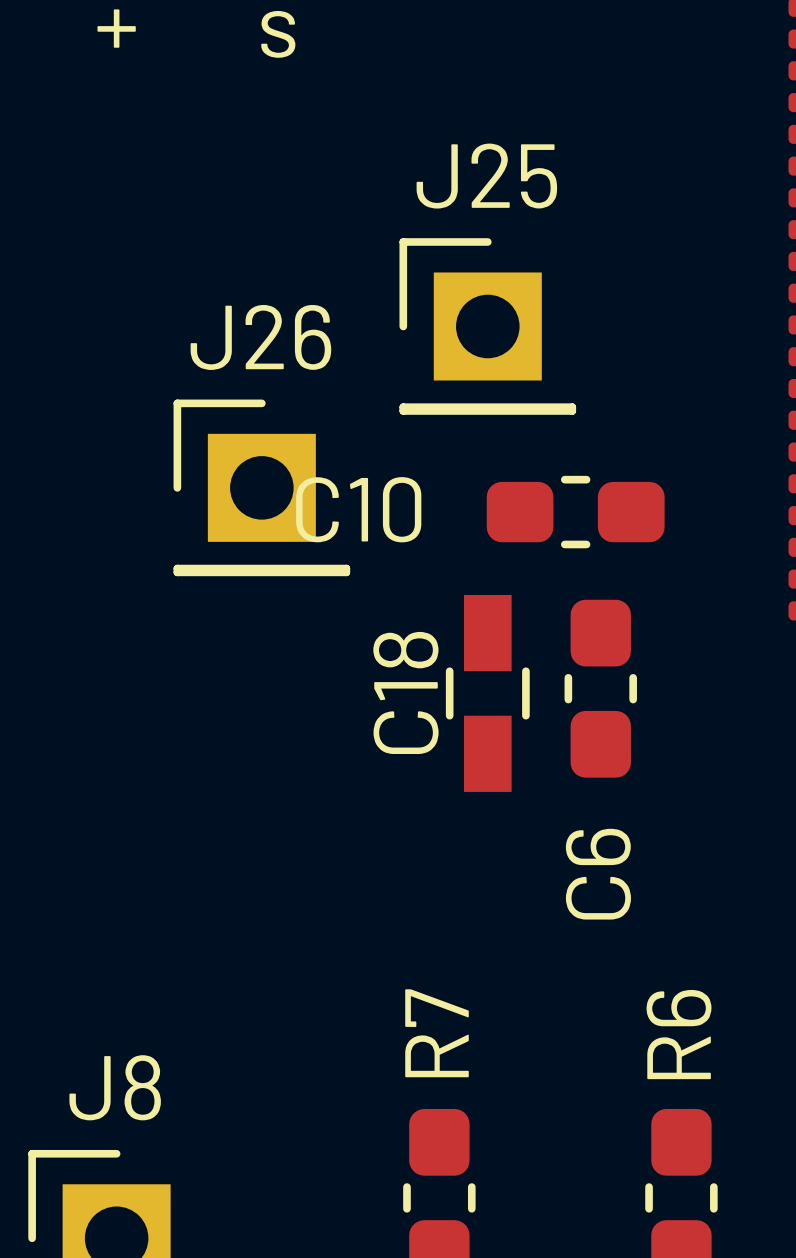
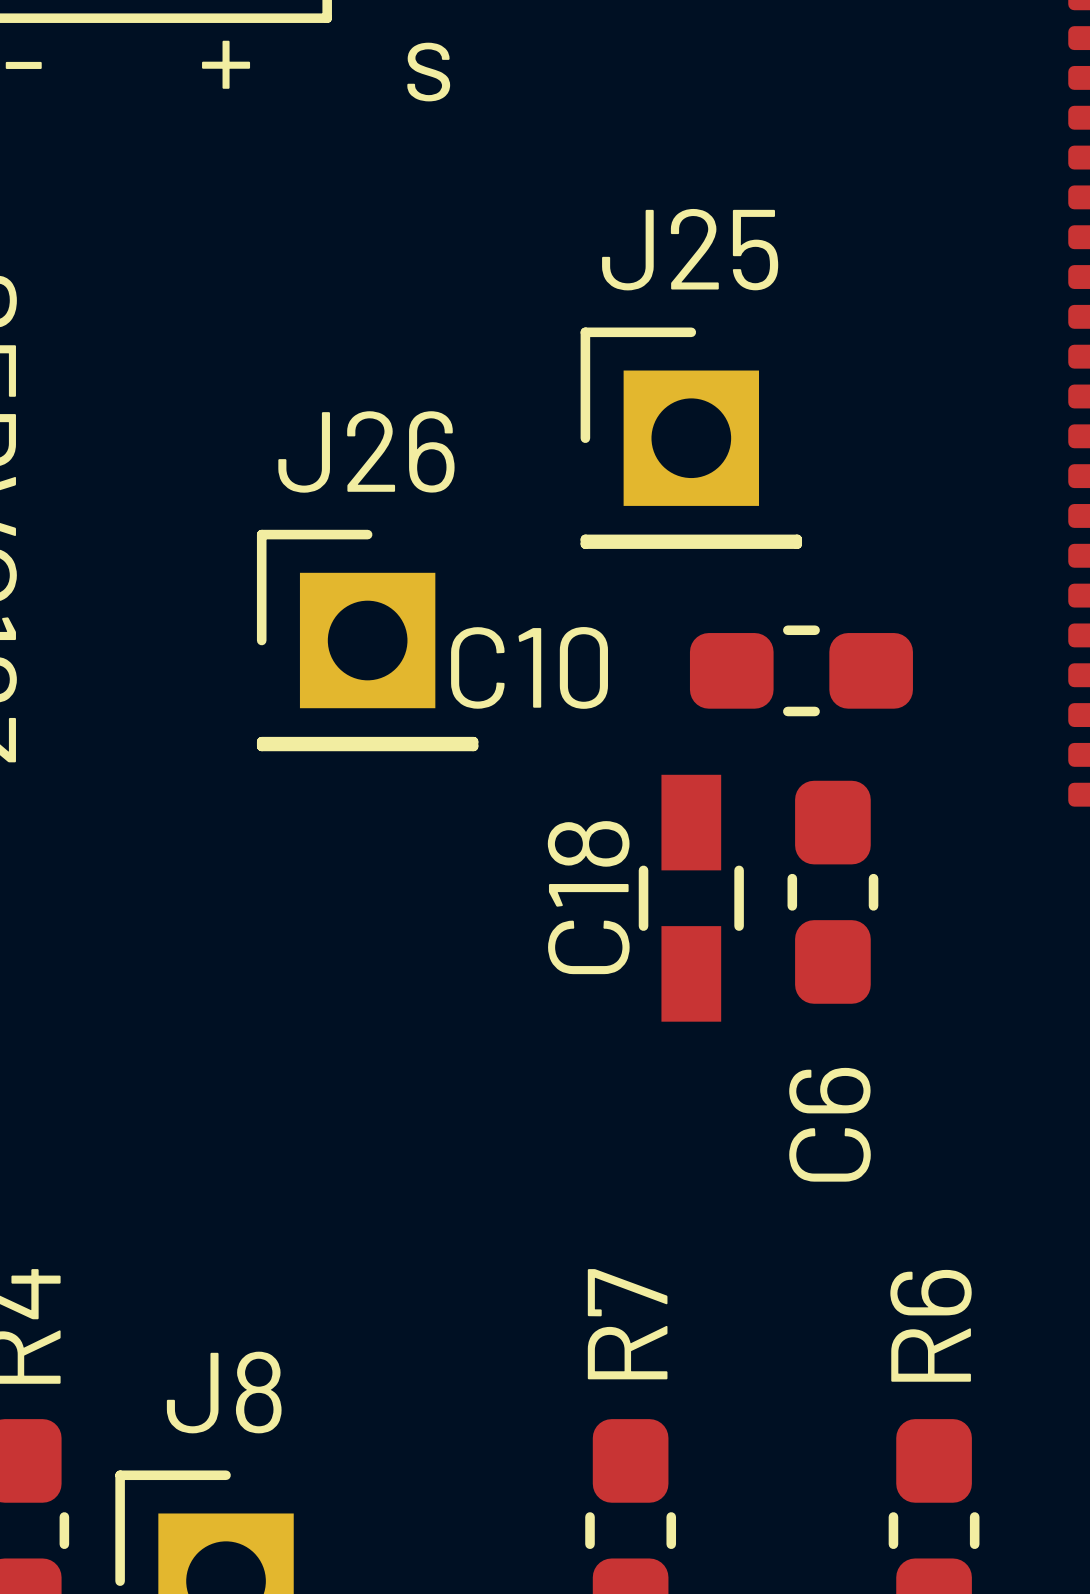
J26 position: (261, 487) -> (367, 640)

